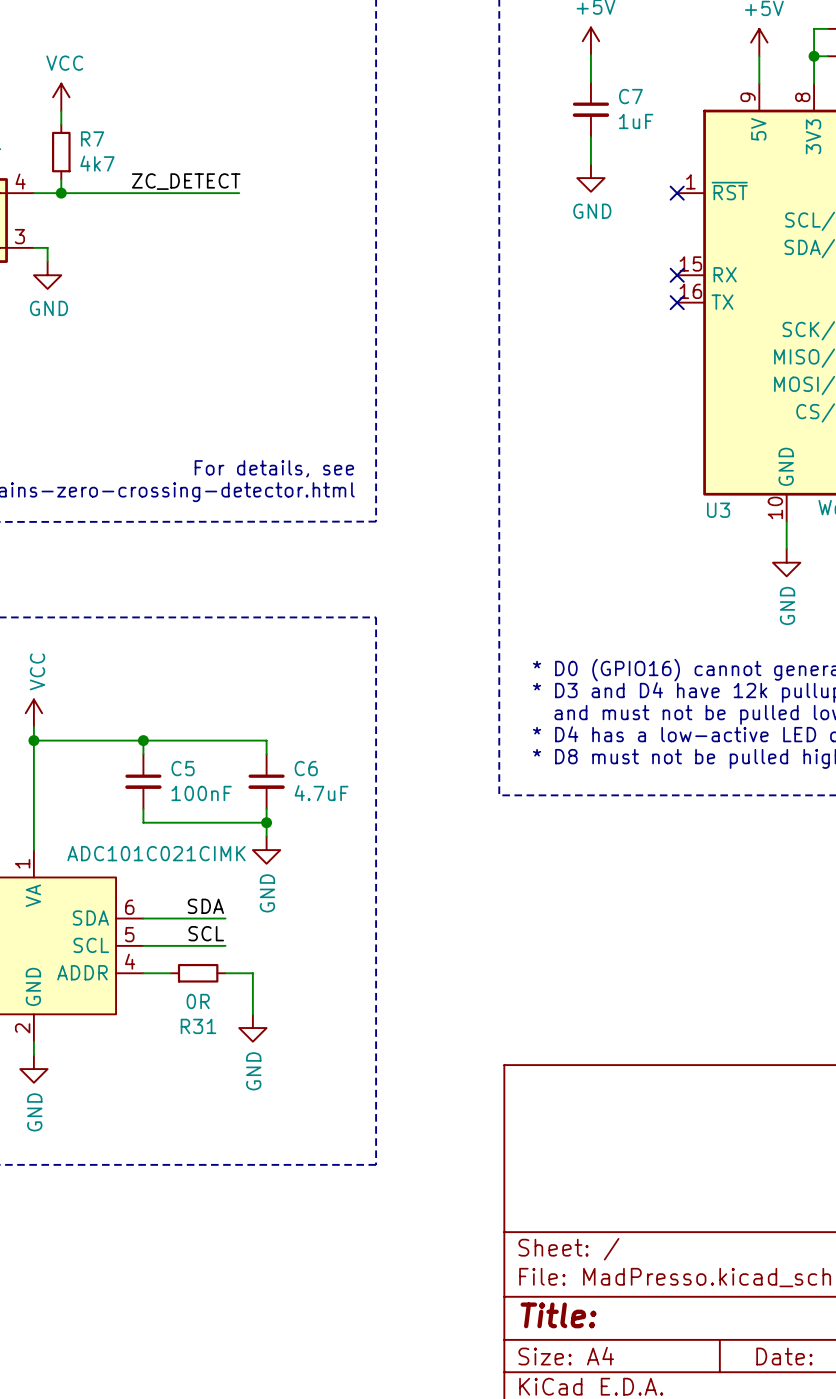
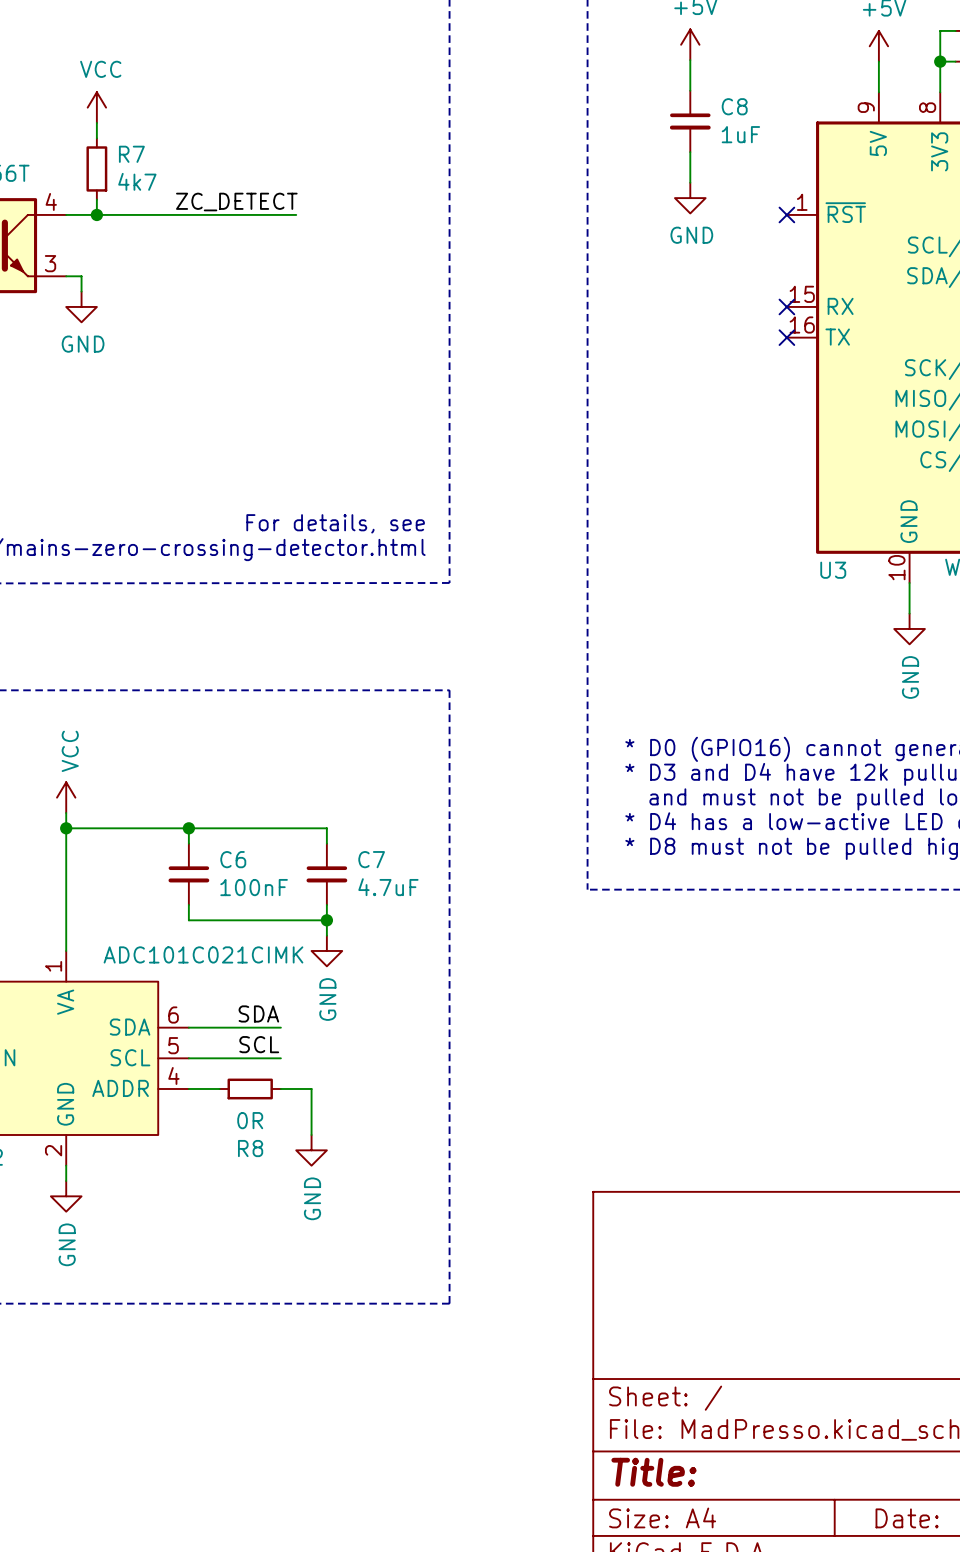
C7 name: C7 (630, 96) -> C8 (734, 106)
C5 name: C5 (183, 768) -> C6 (233, 859)
C6 name: C6 (306, 768) -> C7 (371, 859)
R31 name: R31 (198, 1026) -> R8 (250, 1148)

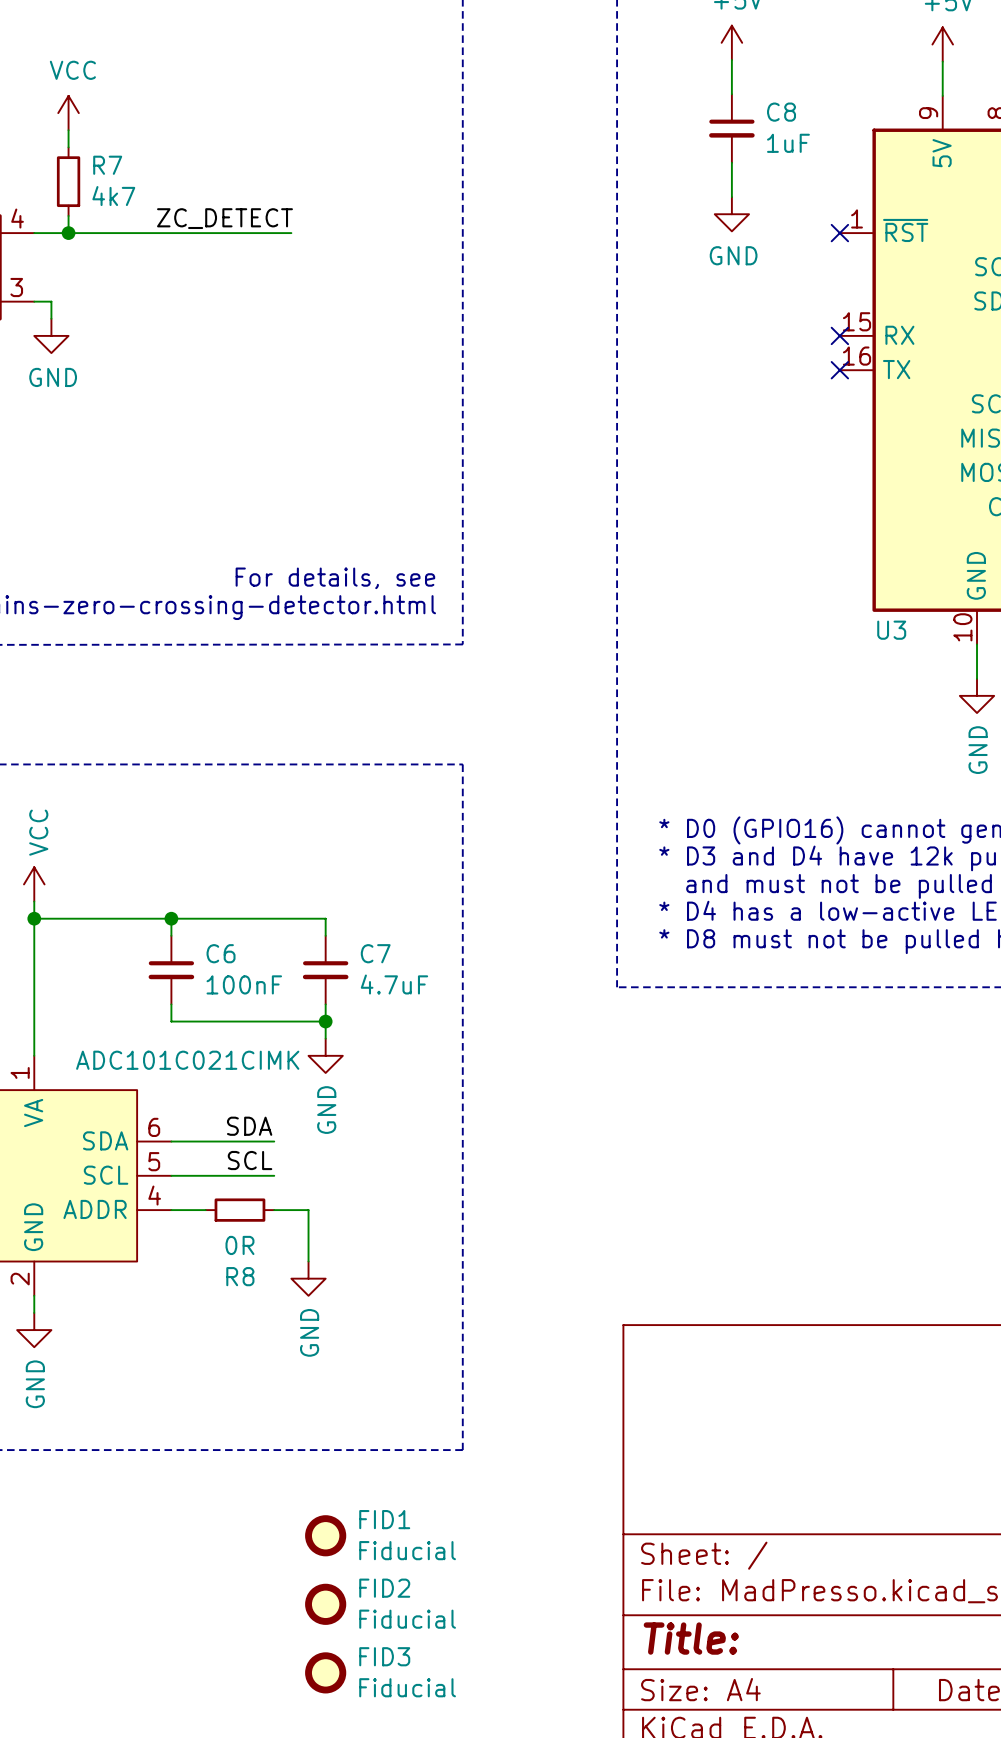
FID1: none -> Fiducial (325, 1535)
FID2: none -> Fiducial (325, 1604)
FID3: none -> Fiducial (325, 1672)

